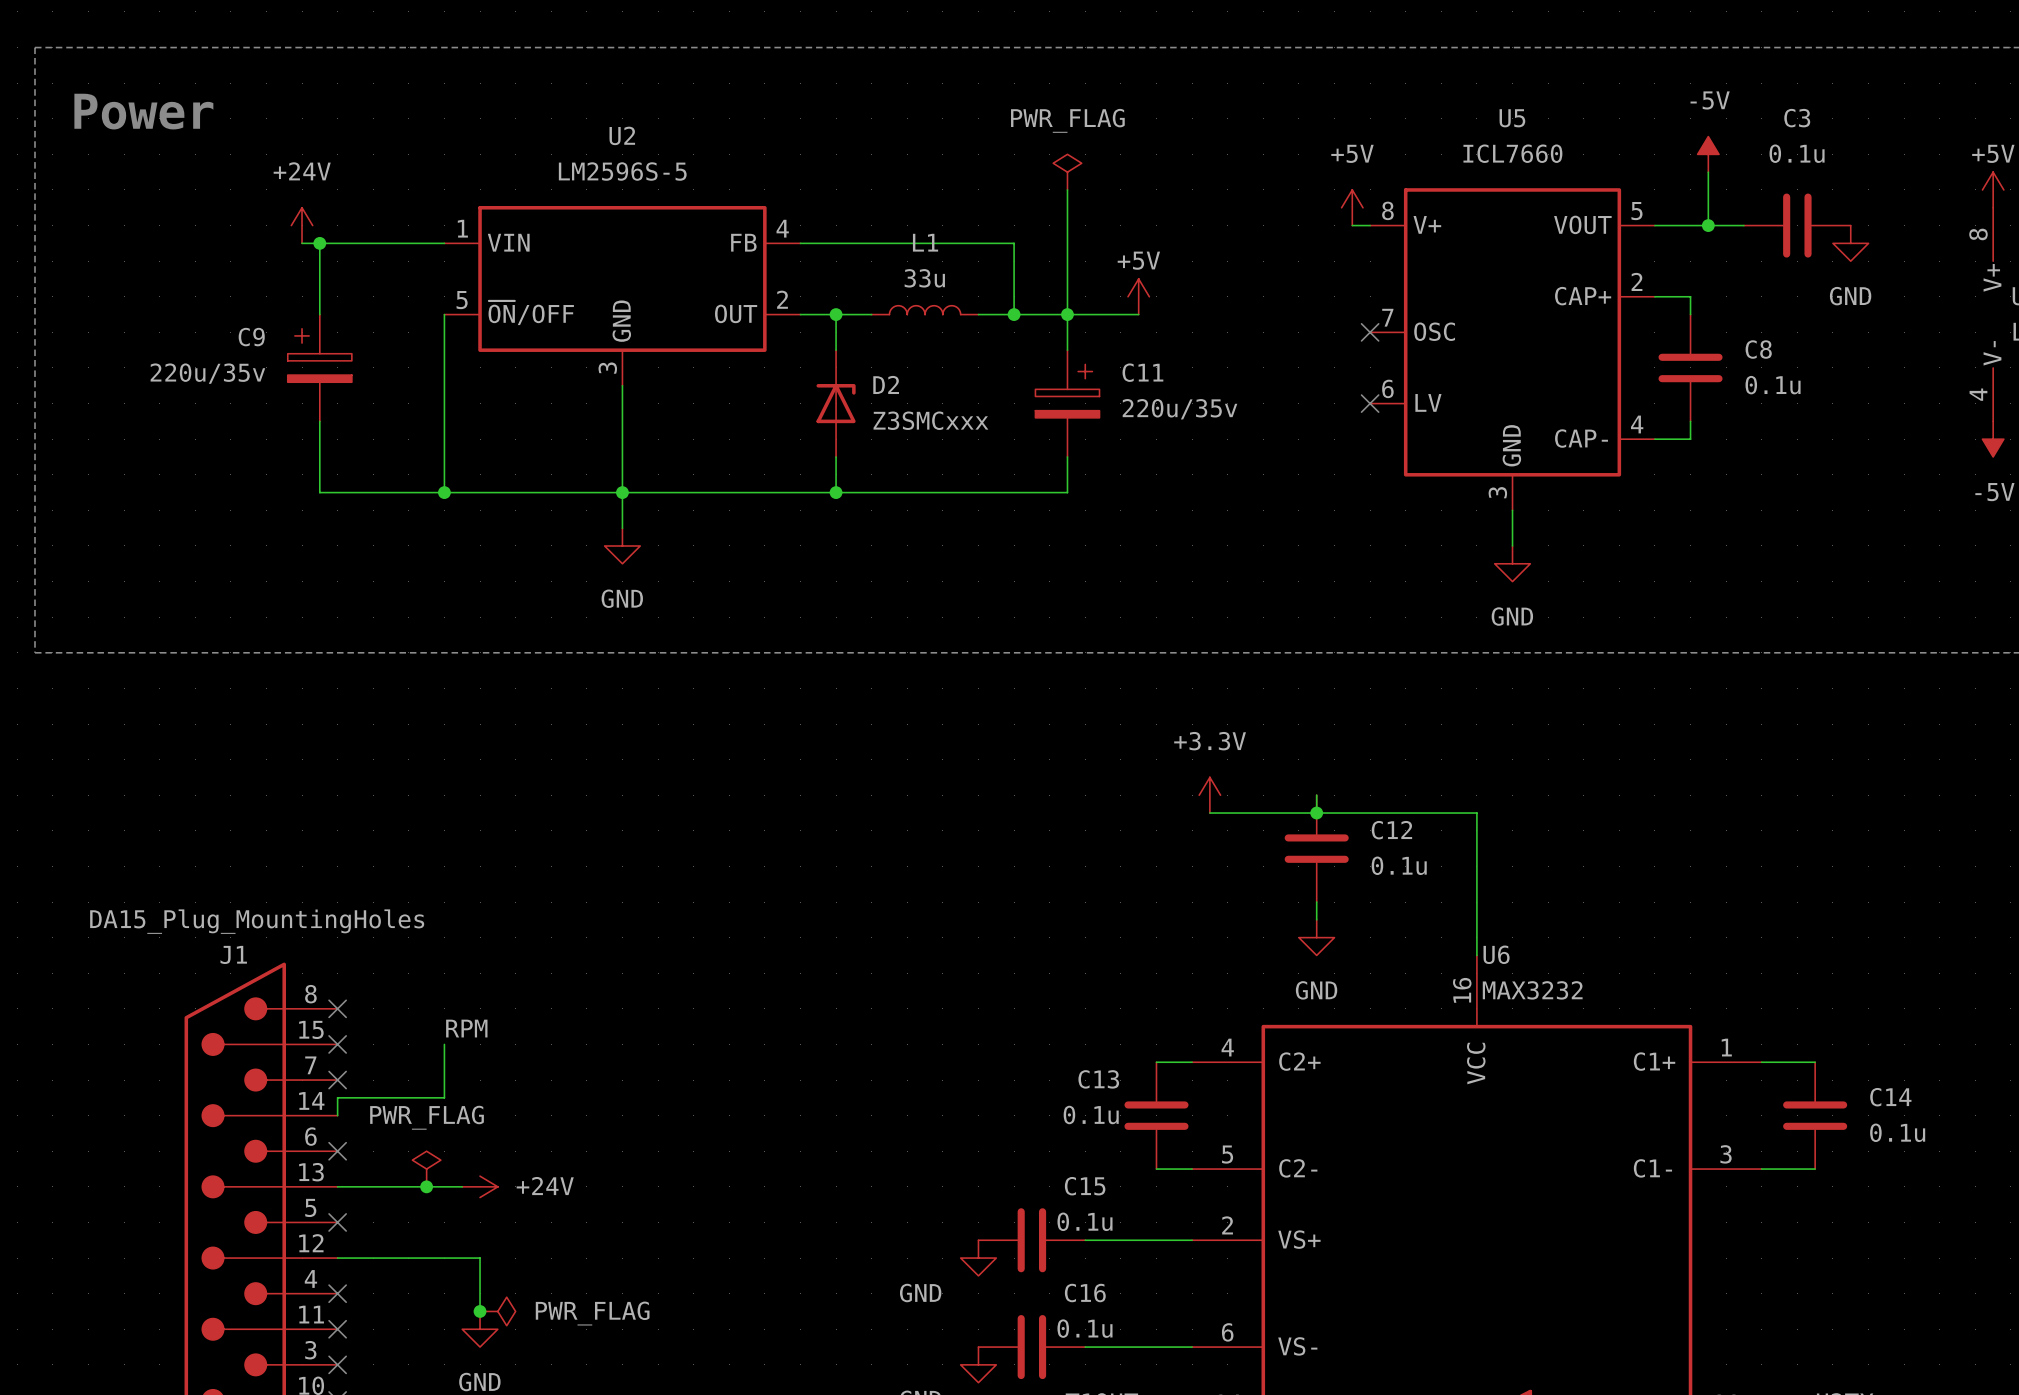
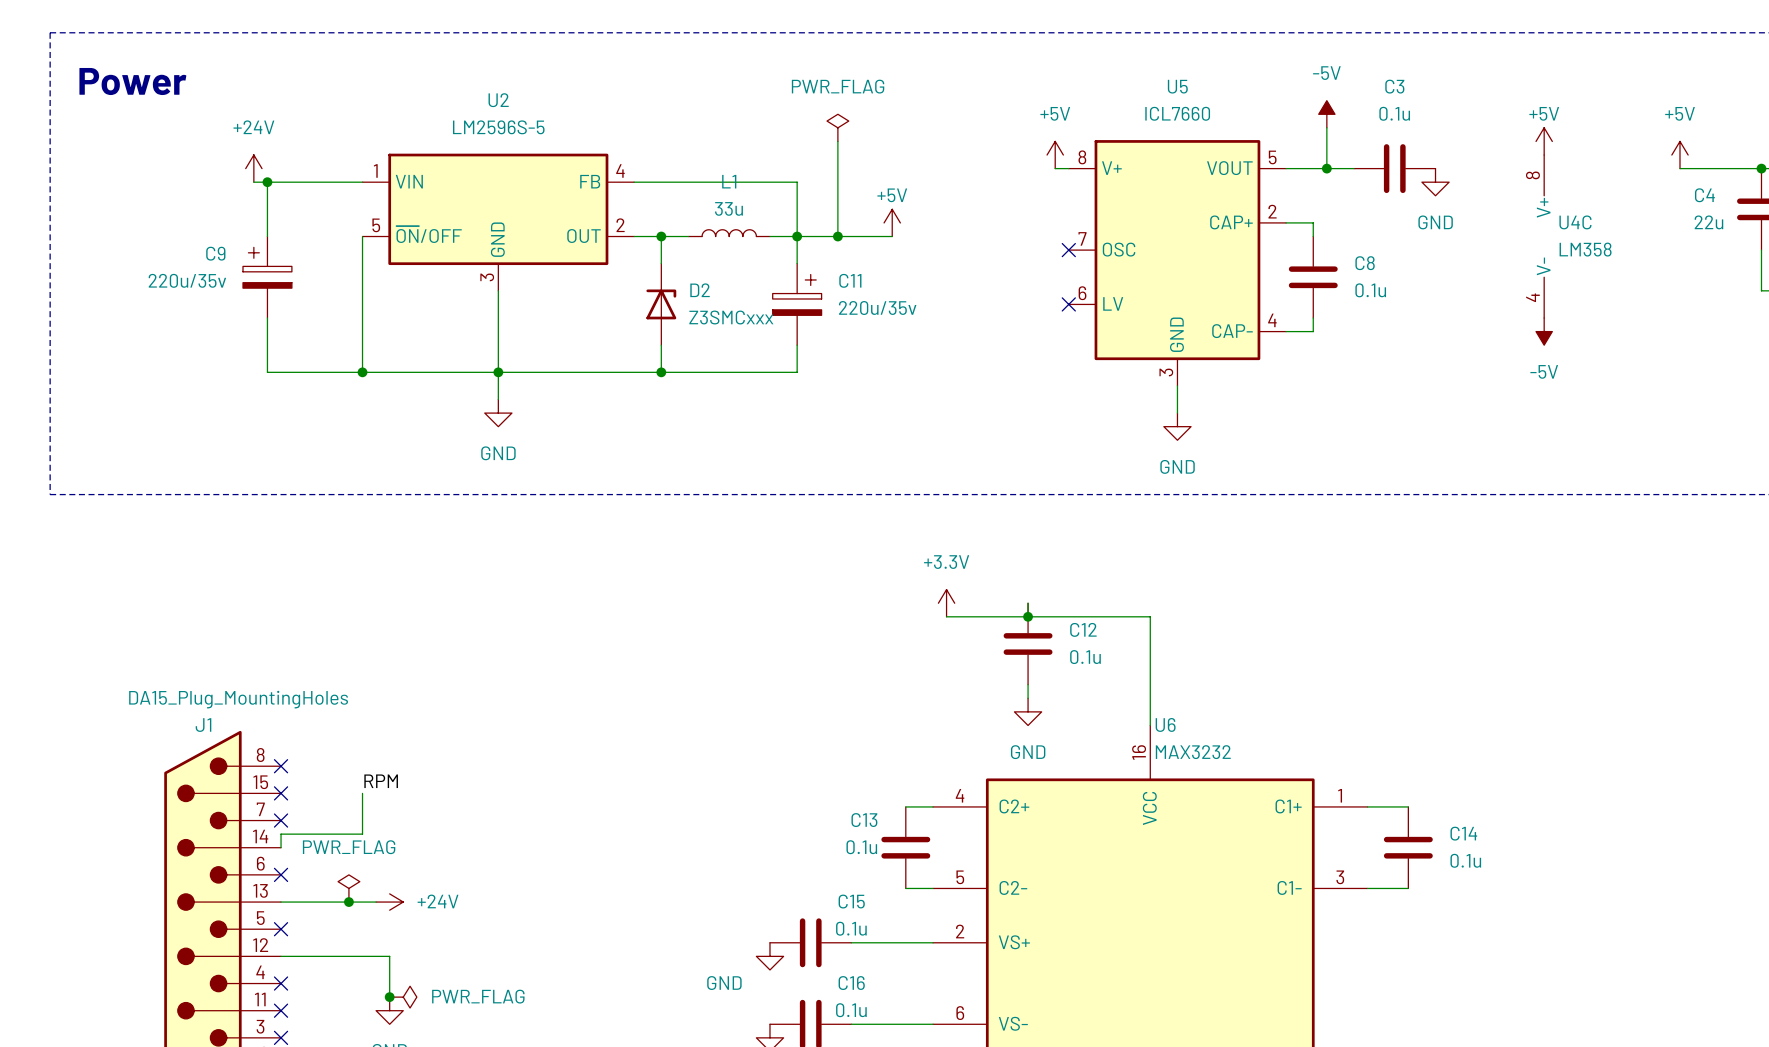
wire: (1067, 314) (1067, 350) -> (797, 236) (797, 263)
C11 position: (1067, 403) -> (797, 304)
wire: (1067, 456) (1067, 492) (1014, 492) -> (797, 345) (797, 372)

